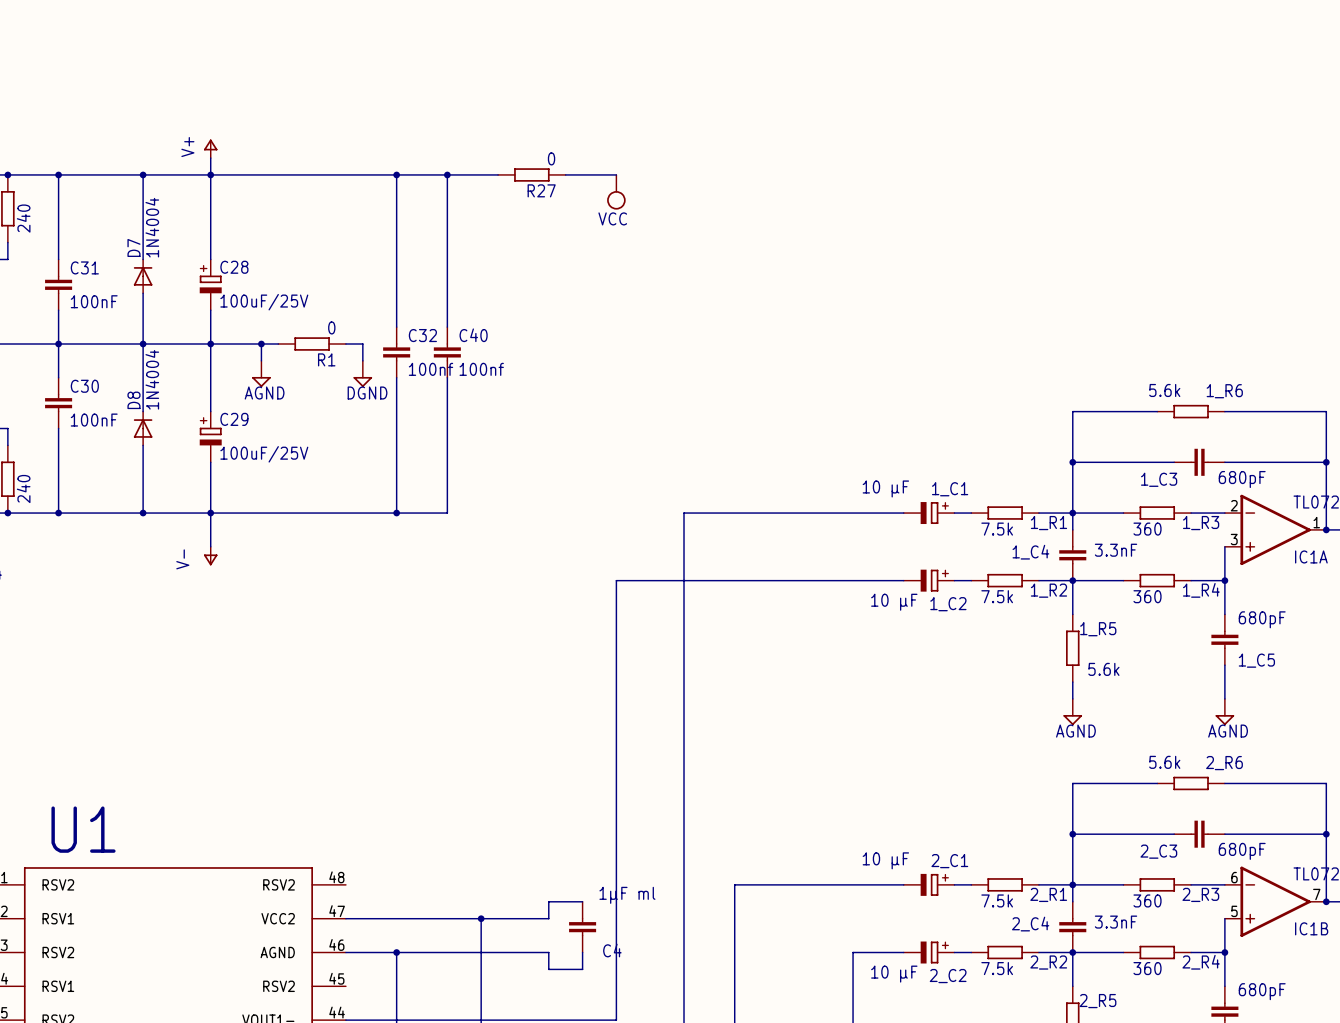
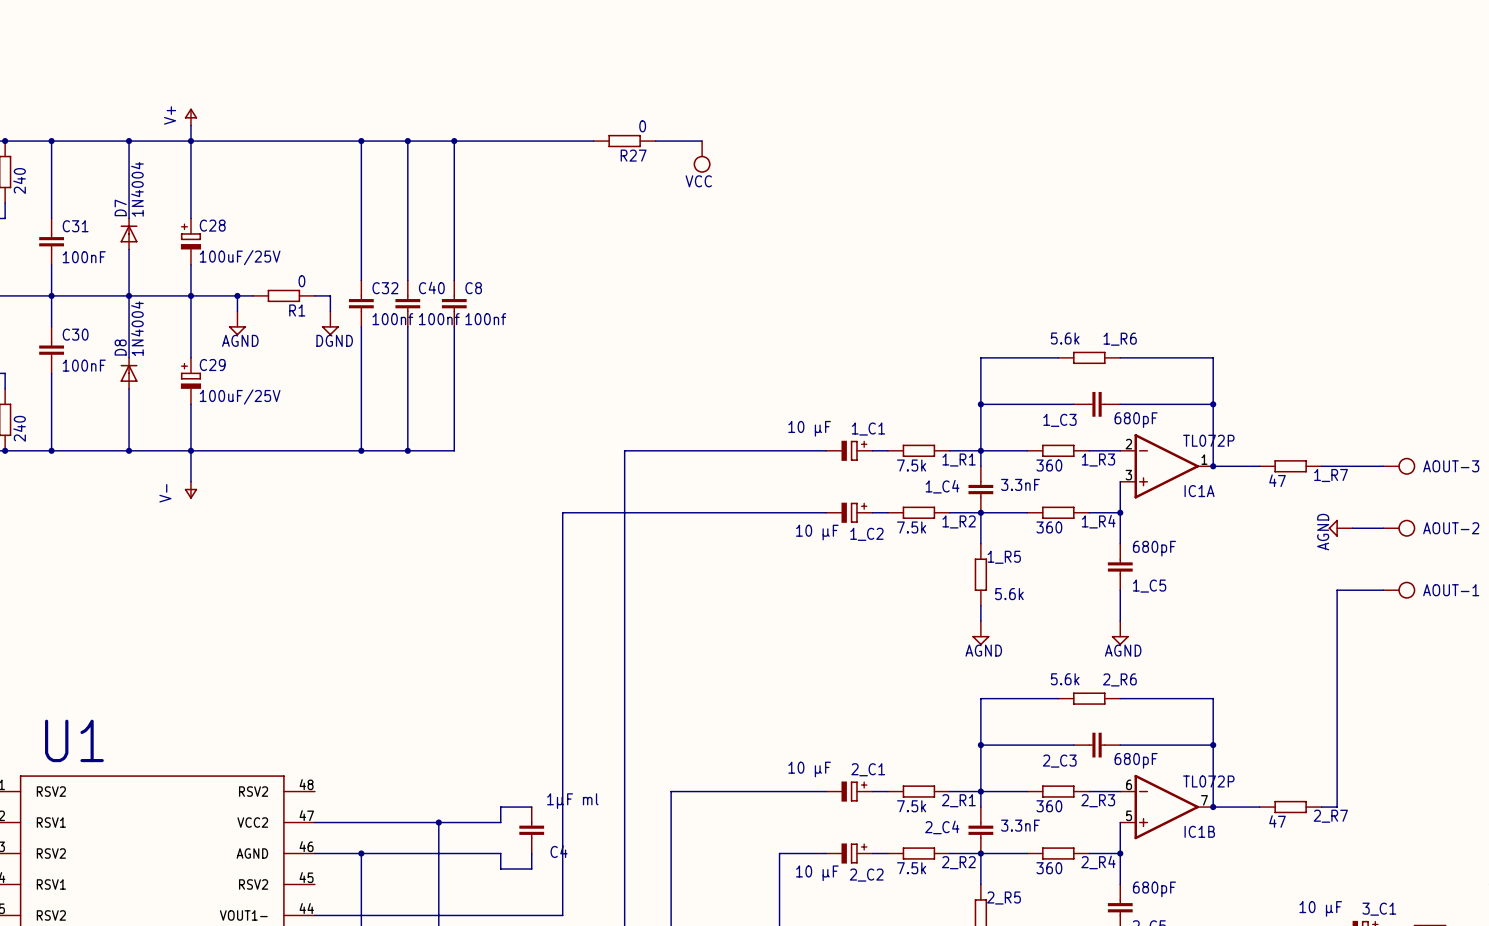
junction: none -> (454, 141)
R27 position: (531, 174) -> (624, 141)
wire: none -> (516, 141) (454, 141) (454, 280)
wire: none -> (562, 141) (593, 141)
wire: none -> (655, 141) (702, 141)
power symbol position: VCC (616, 192) -> VCC (702, 156)
C8: none -> 100nf (454, 303)
wire: none -> (454, 326) (454, 450) (407, 450)
junction: none -> (407, 450)

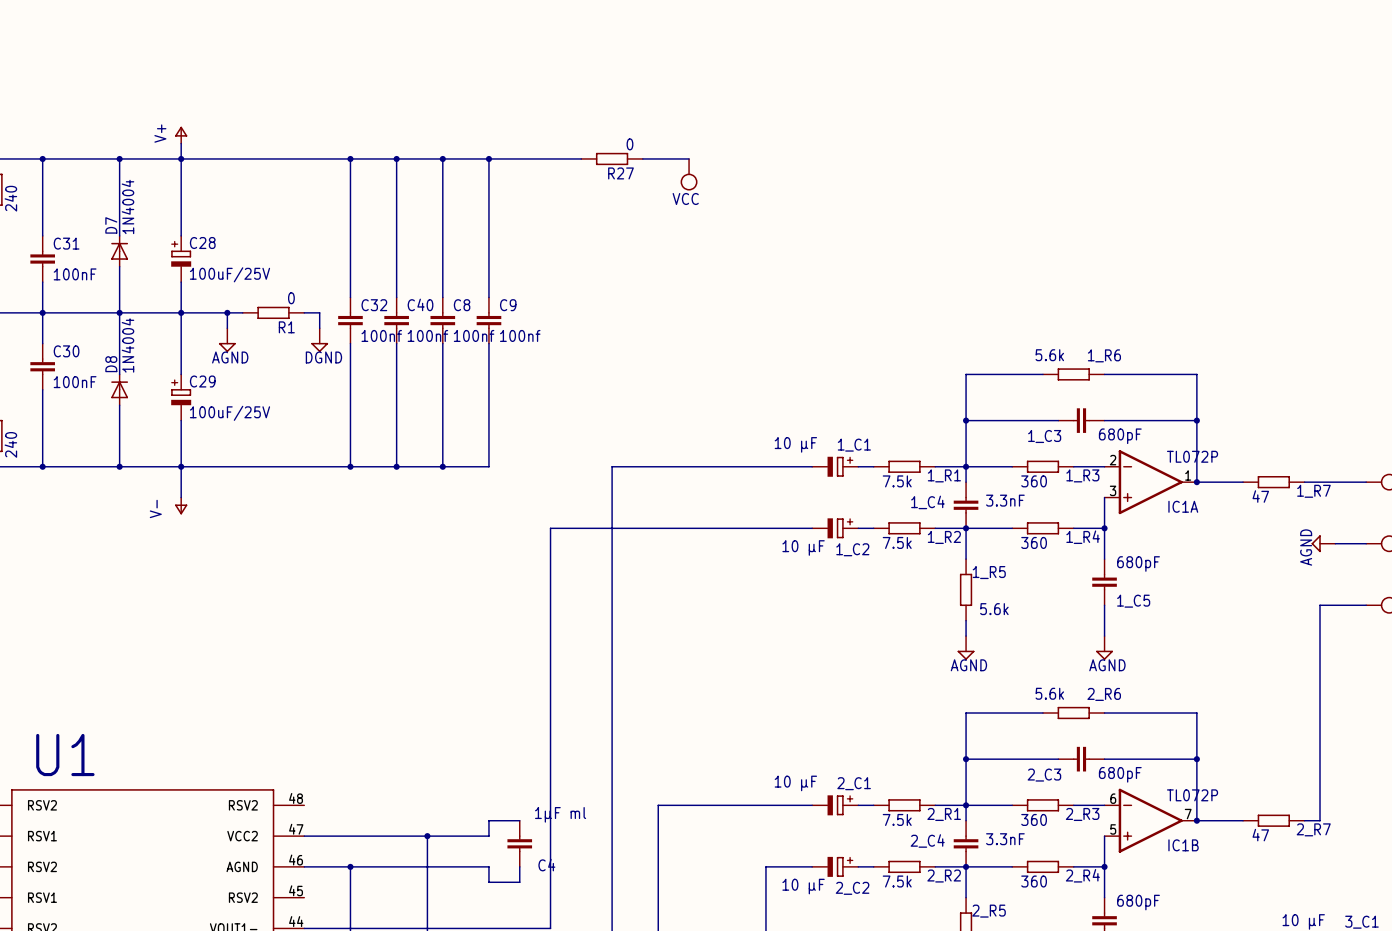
wire: none -> (488, 158) (488, 297)
junction: none -> (488, 158)
C9: none -> 100nf (488, 320)
wire: none -> (488, 343) (488, 466) (442, 466)
junction: none -> (442, 466)

